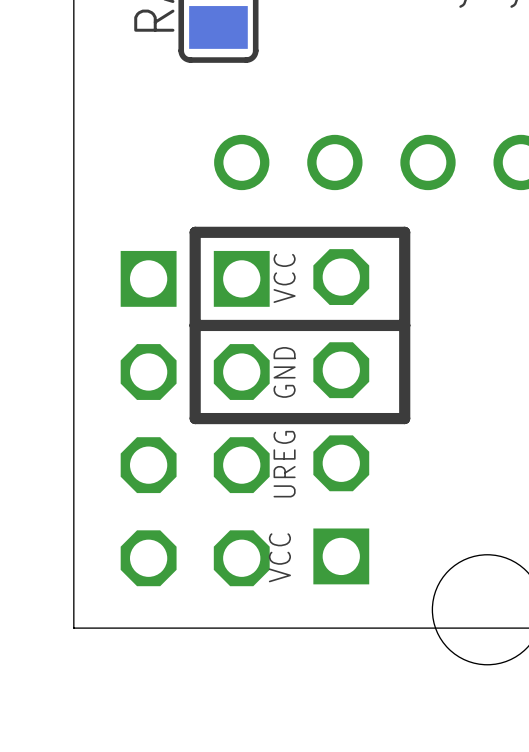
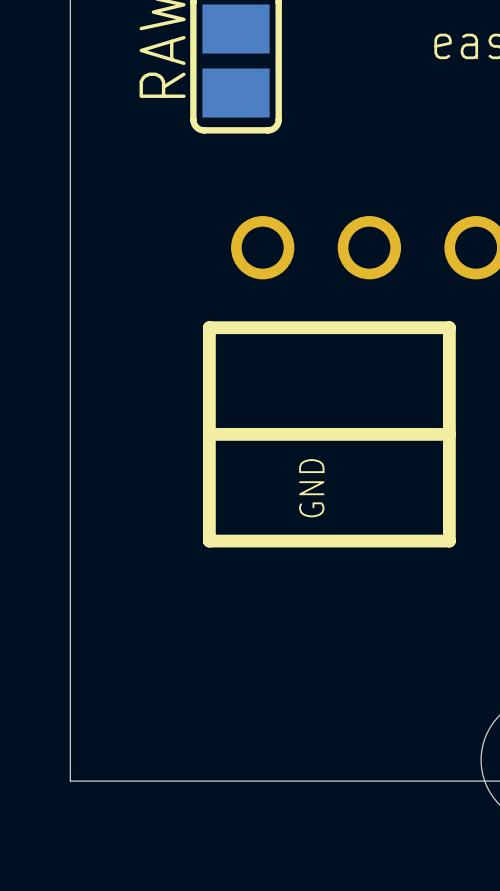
text: VCC (284, 278) -> none
part: (341, 416) -> none
part: (148, 418) -> none
part: (241, 418) -> none
text: UREG (284, 464) -> none
text: VCC (279, 557) -> none

